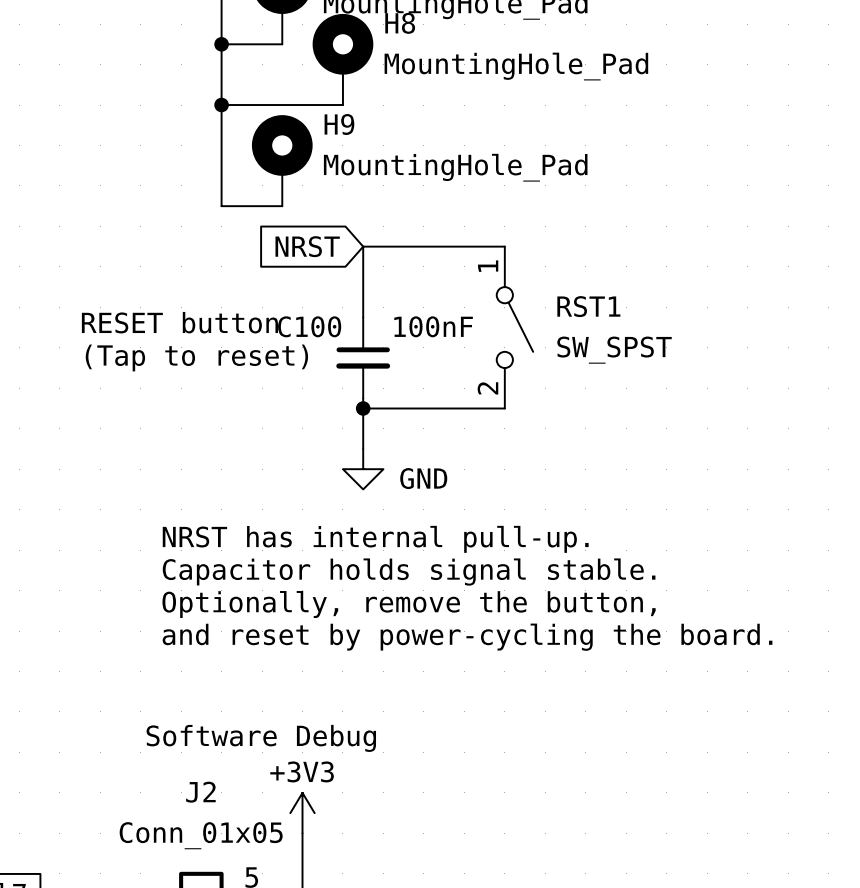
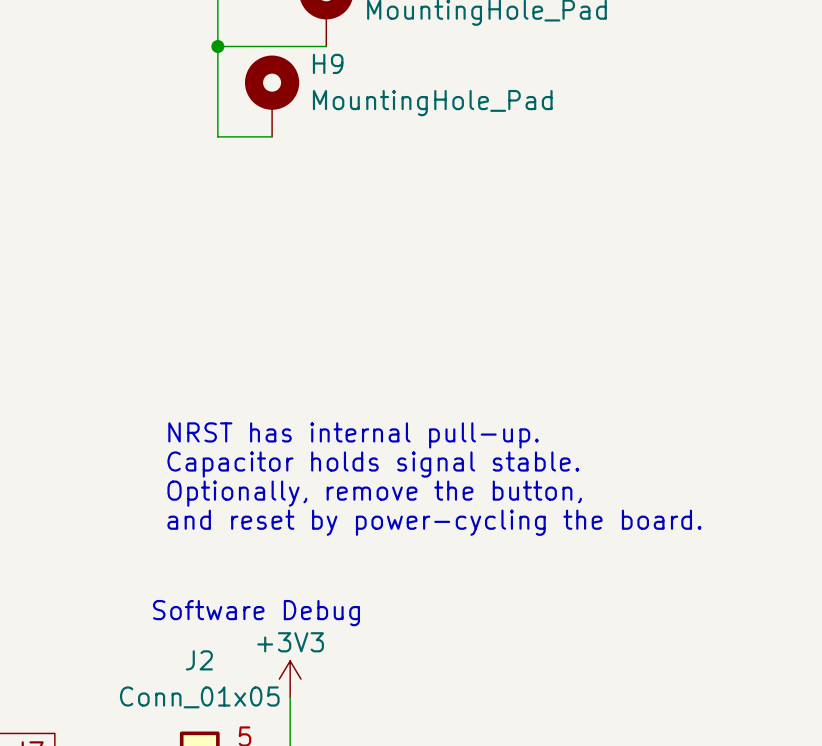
global label: NRST (307, 246) -> none
wire: (504, 246) (363, 246) (363, 317) -> none
text: RESET button (179, 322) -> none
RST1: SW_SPST (514, 327) -> none
text: (Tap to reset) (196, 357) -> none
C100: 100nF (363, 357) -> none
wire: (363, 398) (363, 448) -> none
wire: (363, 408) (504, 408) -> none
junction: (363, 408) -> none
power symbol: GND (363, 469) -> none

